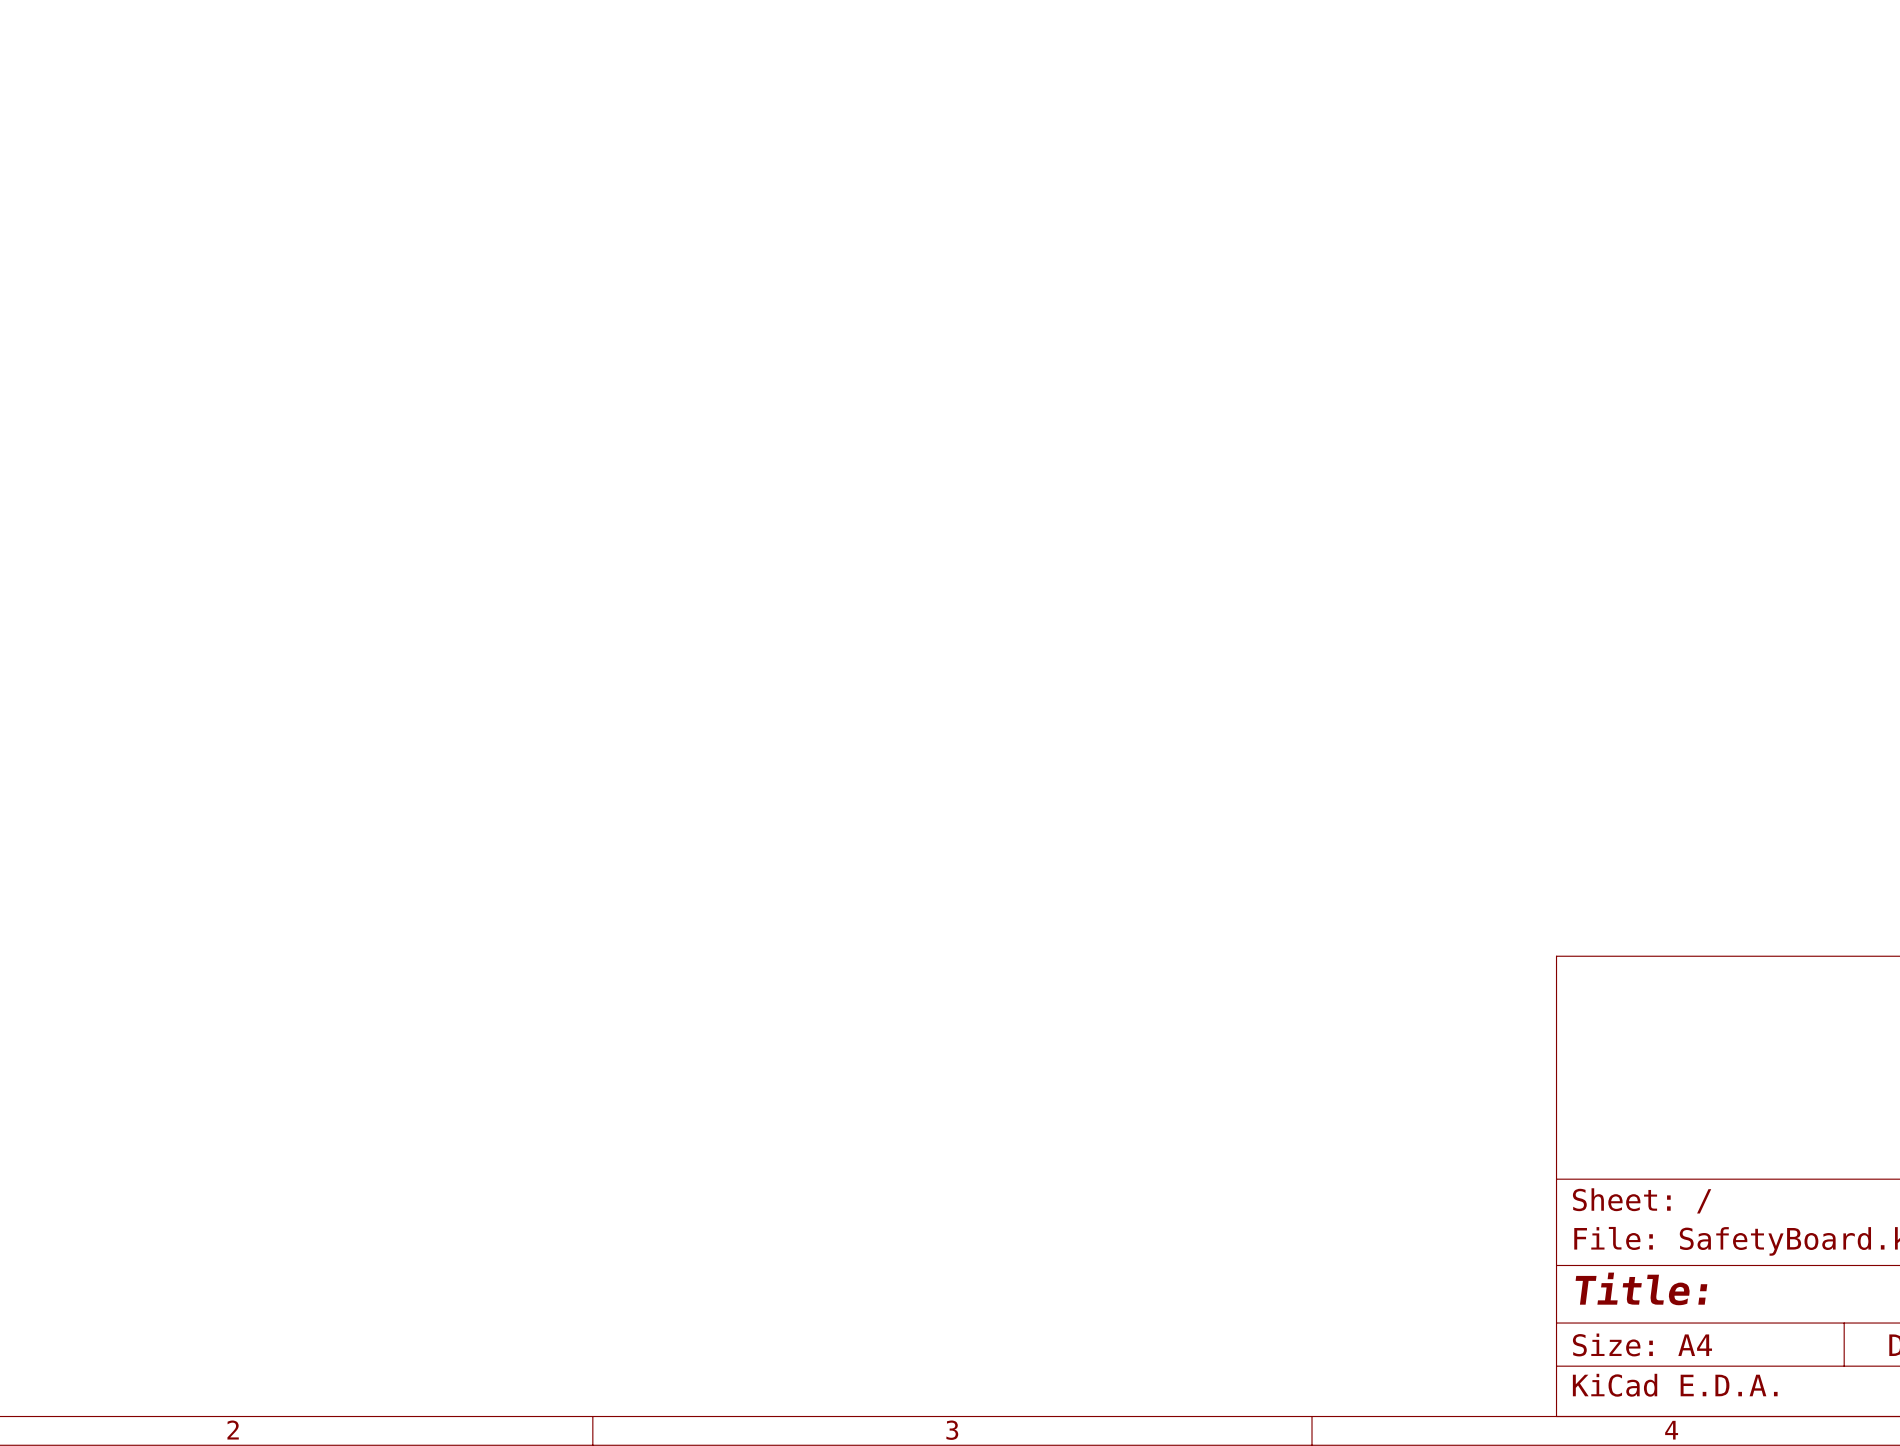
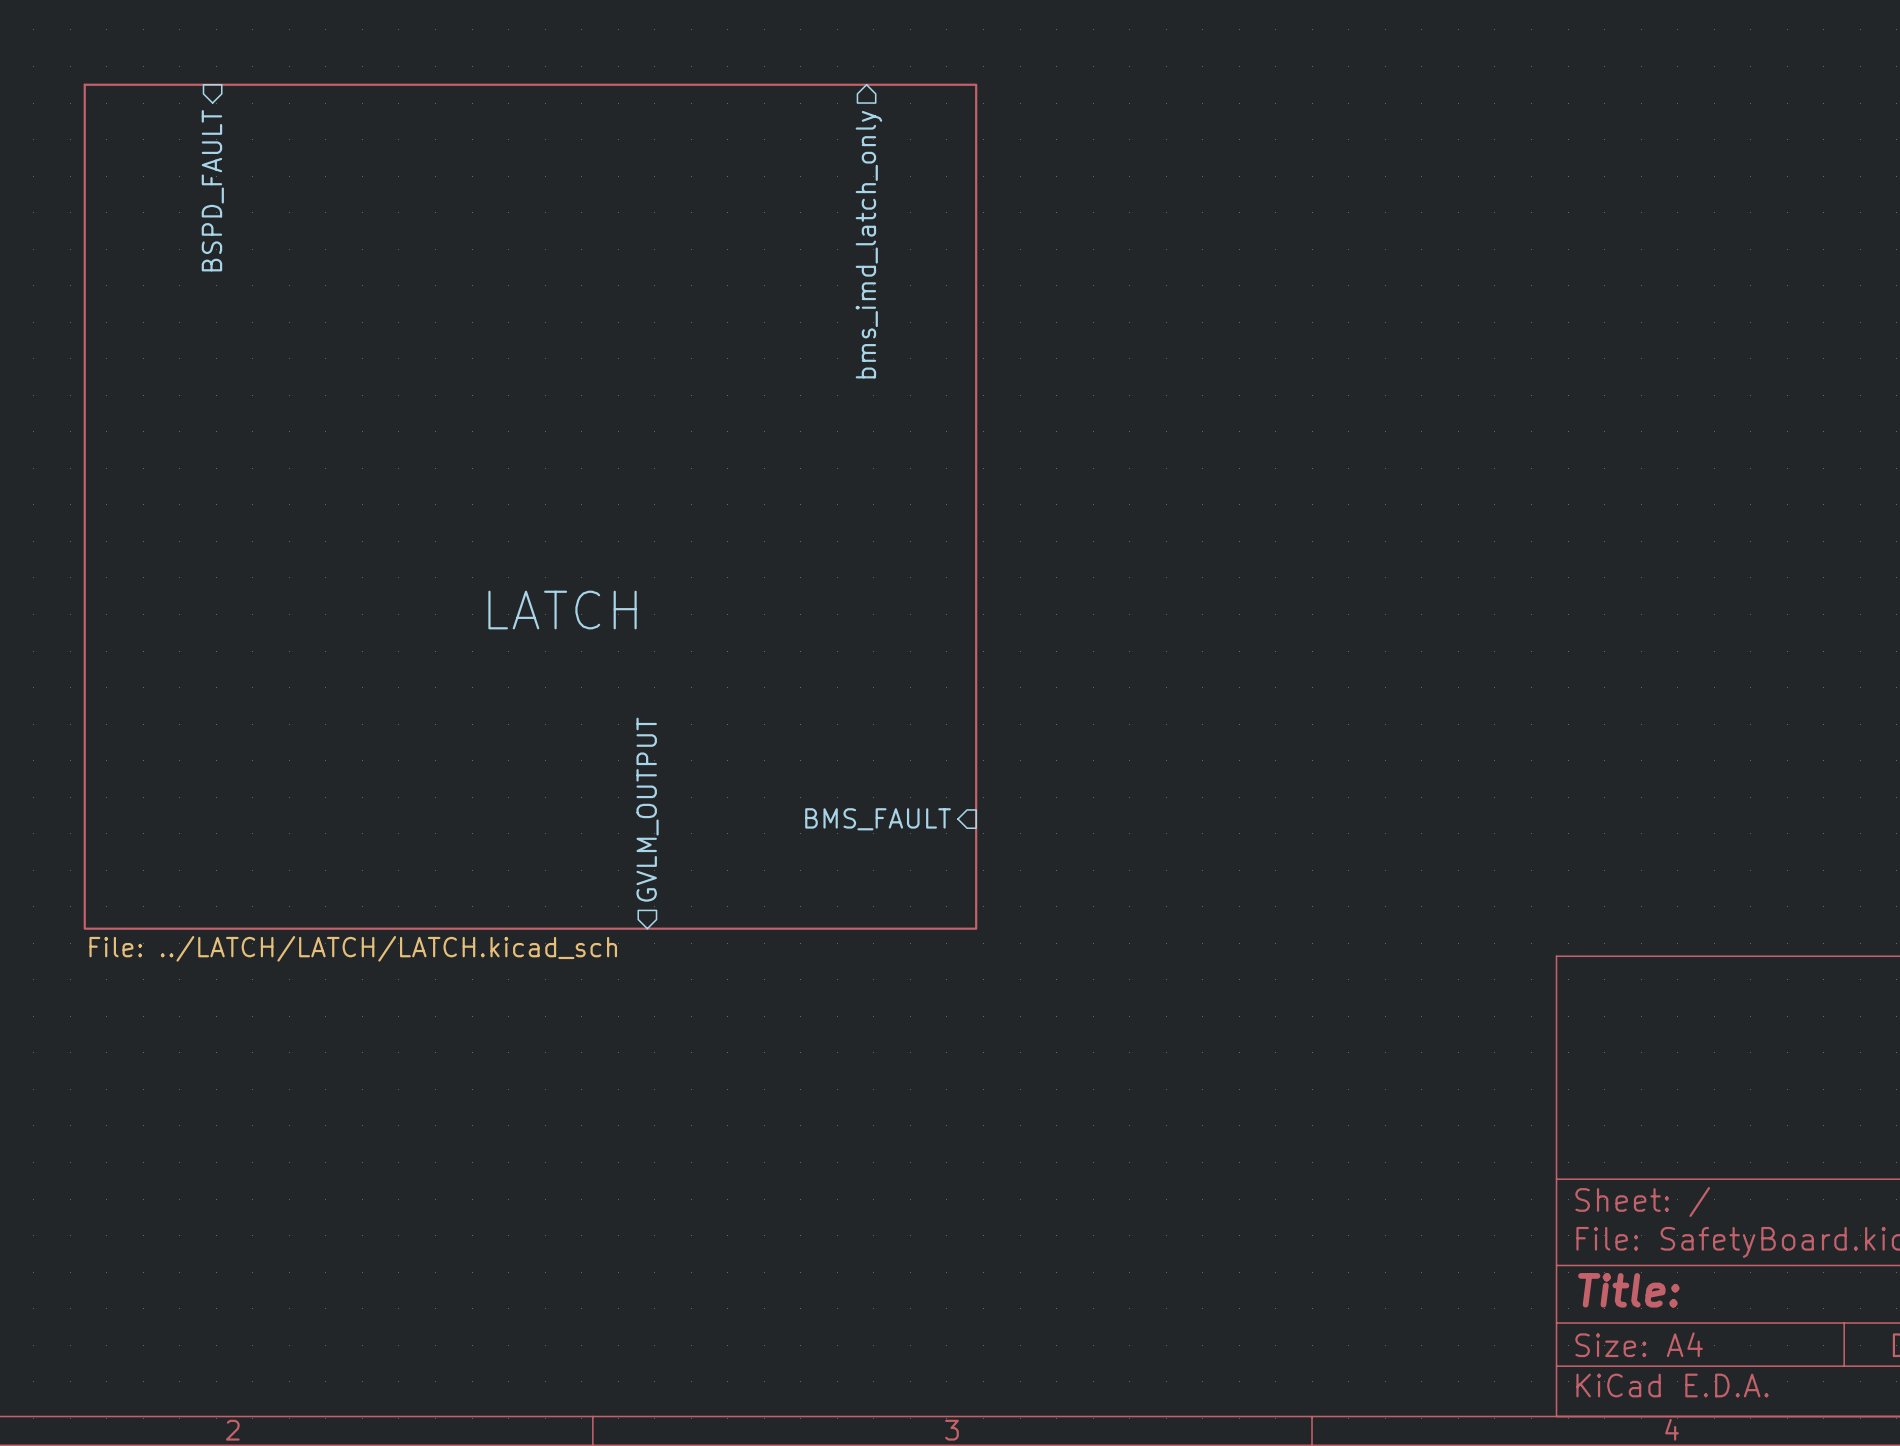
sheet pin: none -> BSPD_FAULT (212, 190)
sheet pin: none -> bms_imd_latch_only (868, 244)
sheet LATCH: none -> File: ../LATCH/LATCH/LATCH.kicad_sch (530, 506)
sheet pin: none -> BMS_FAULT (878, 819)
sheet pin: none -> GVLM_OUTPUT (647, 809)

